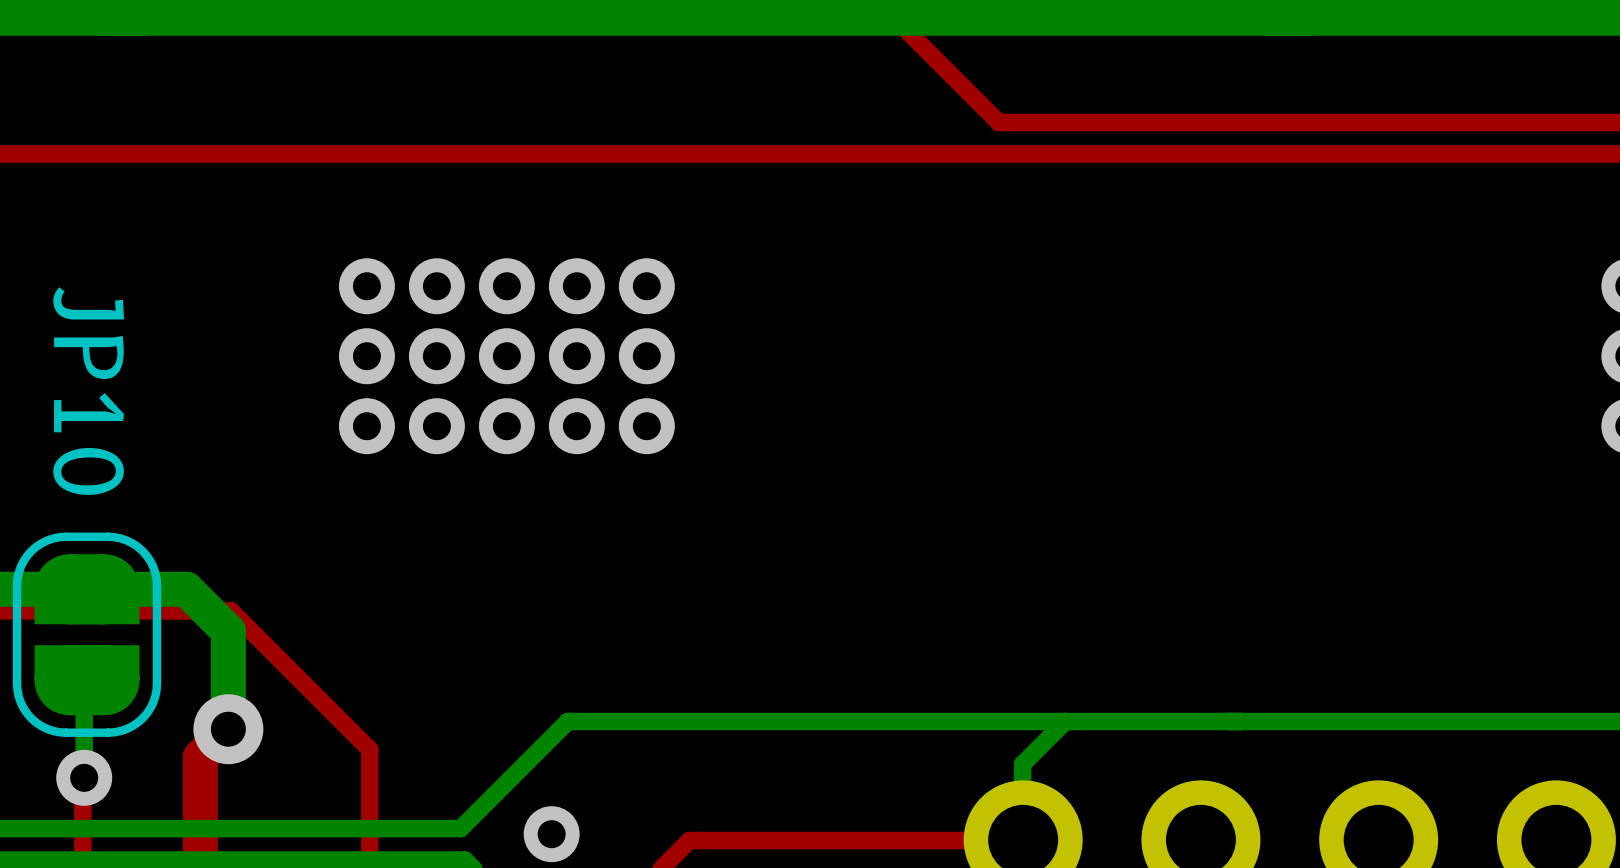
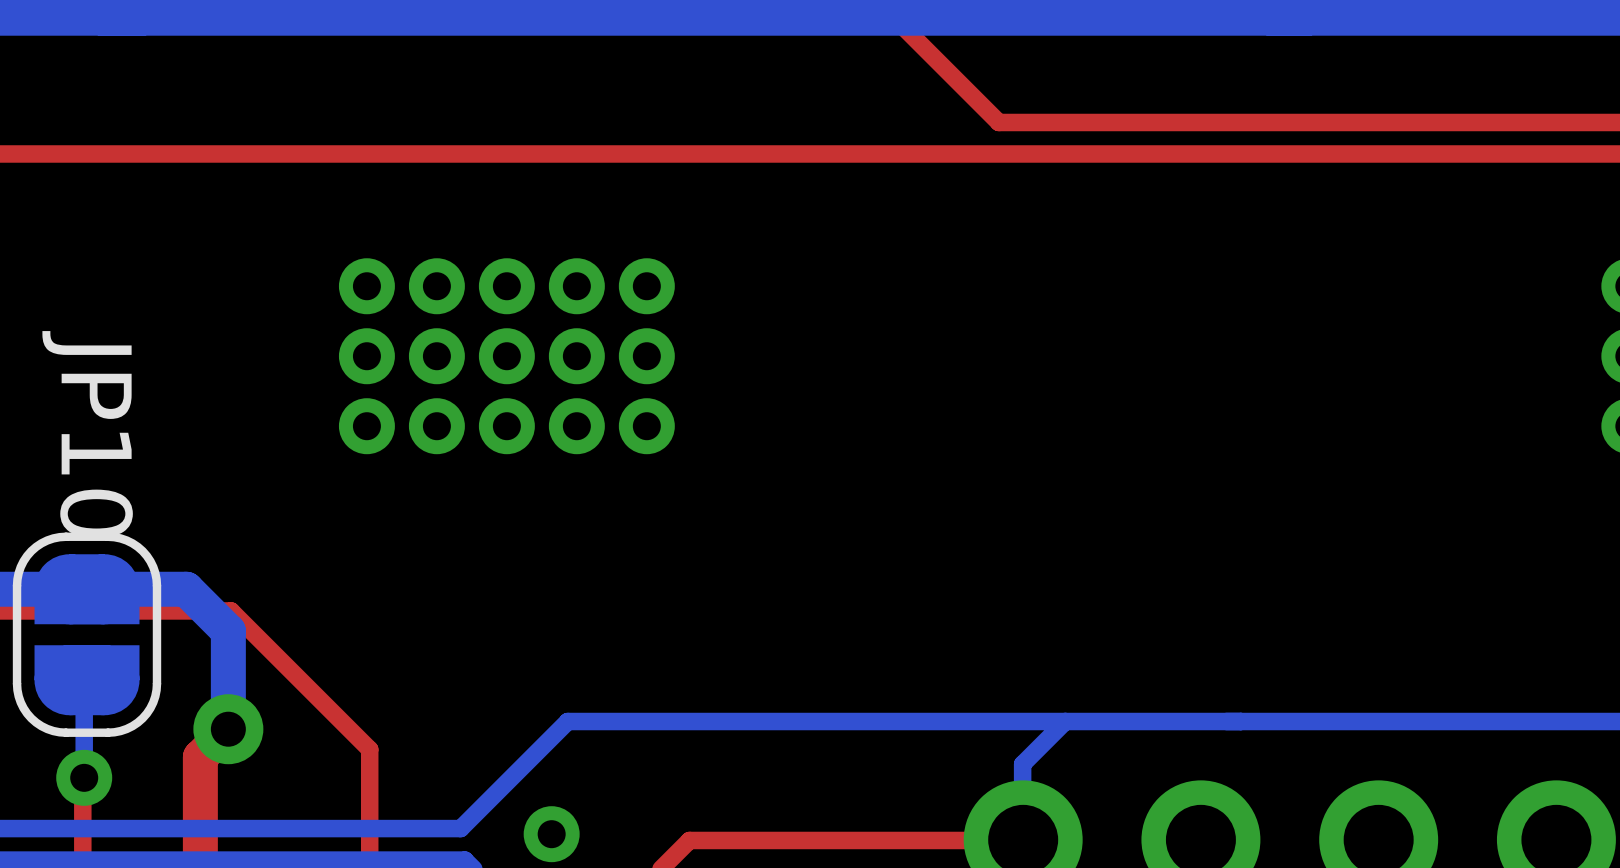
JP10 name position: JP10 (88, 391) -> JP10 (87, 434)

